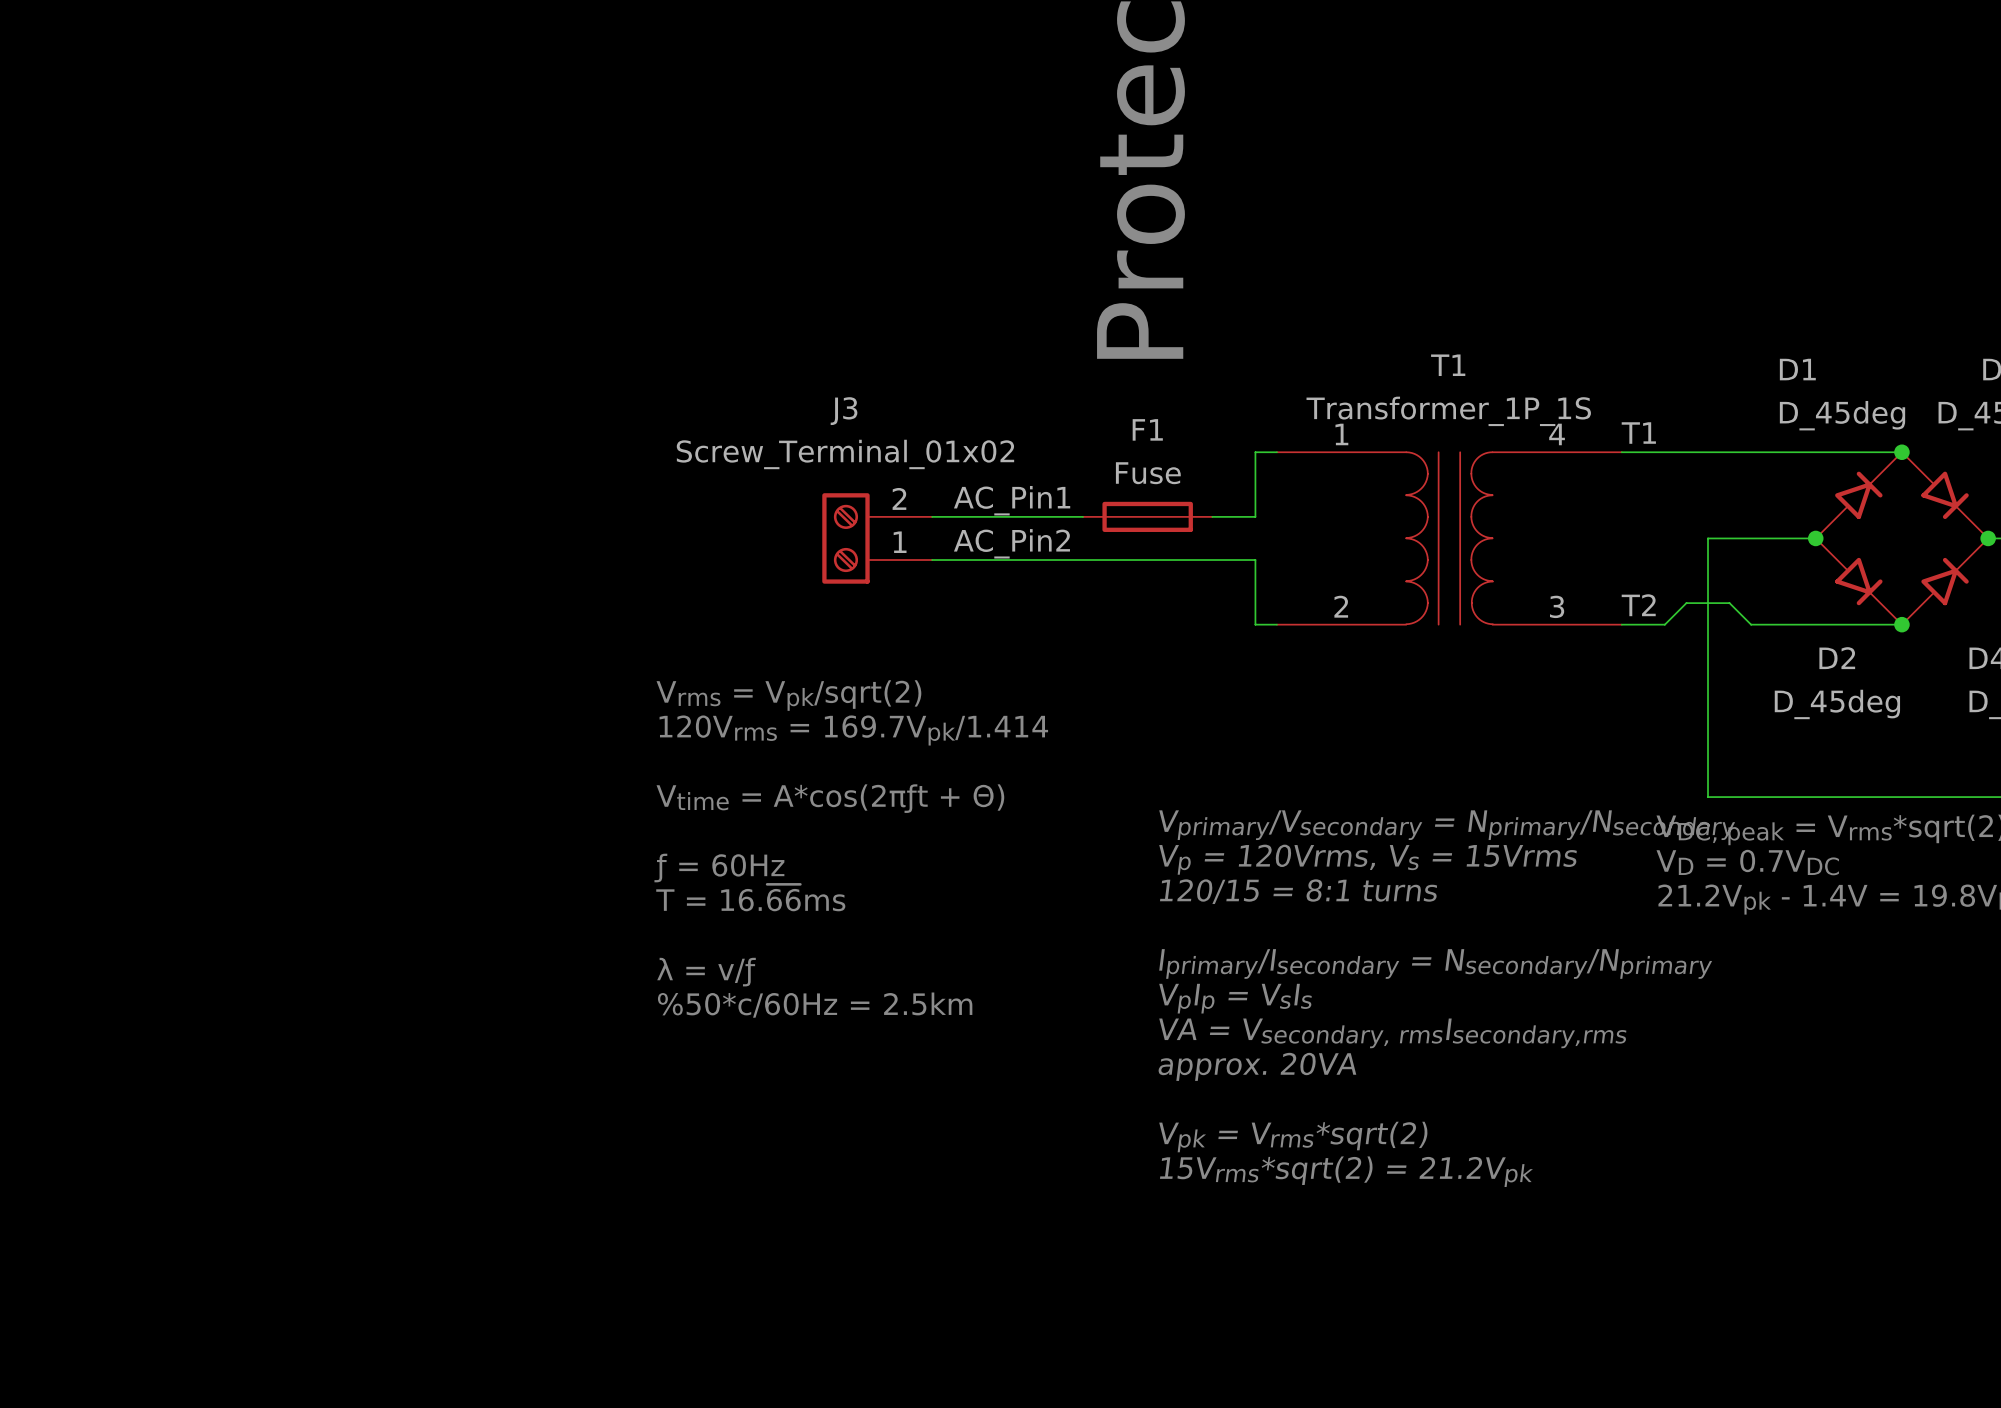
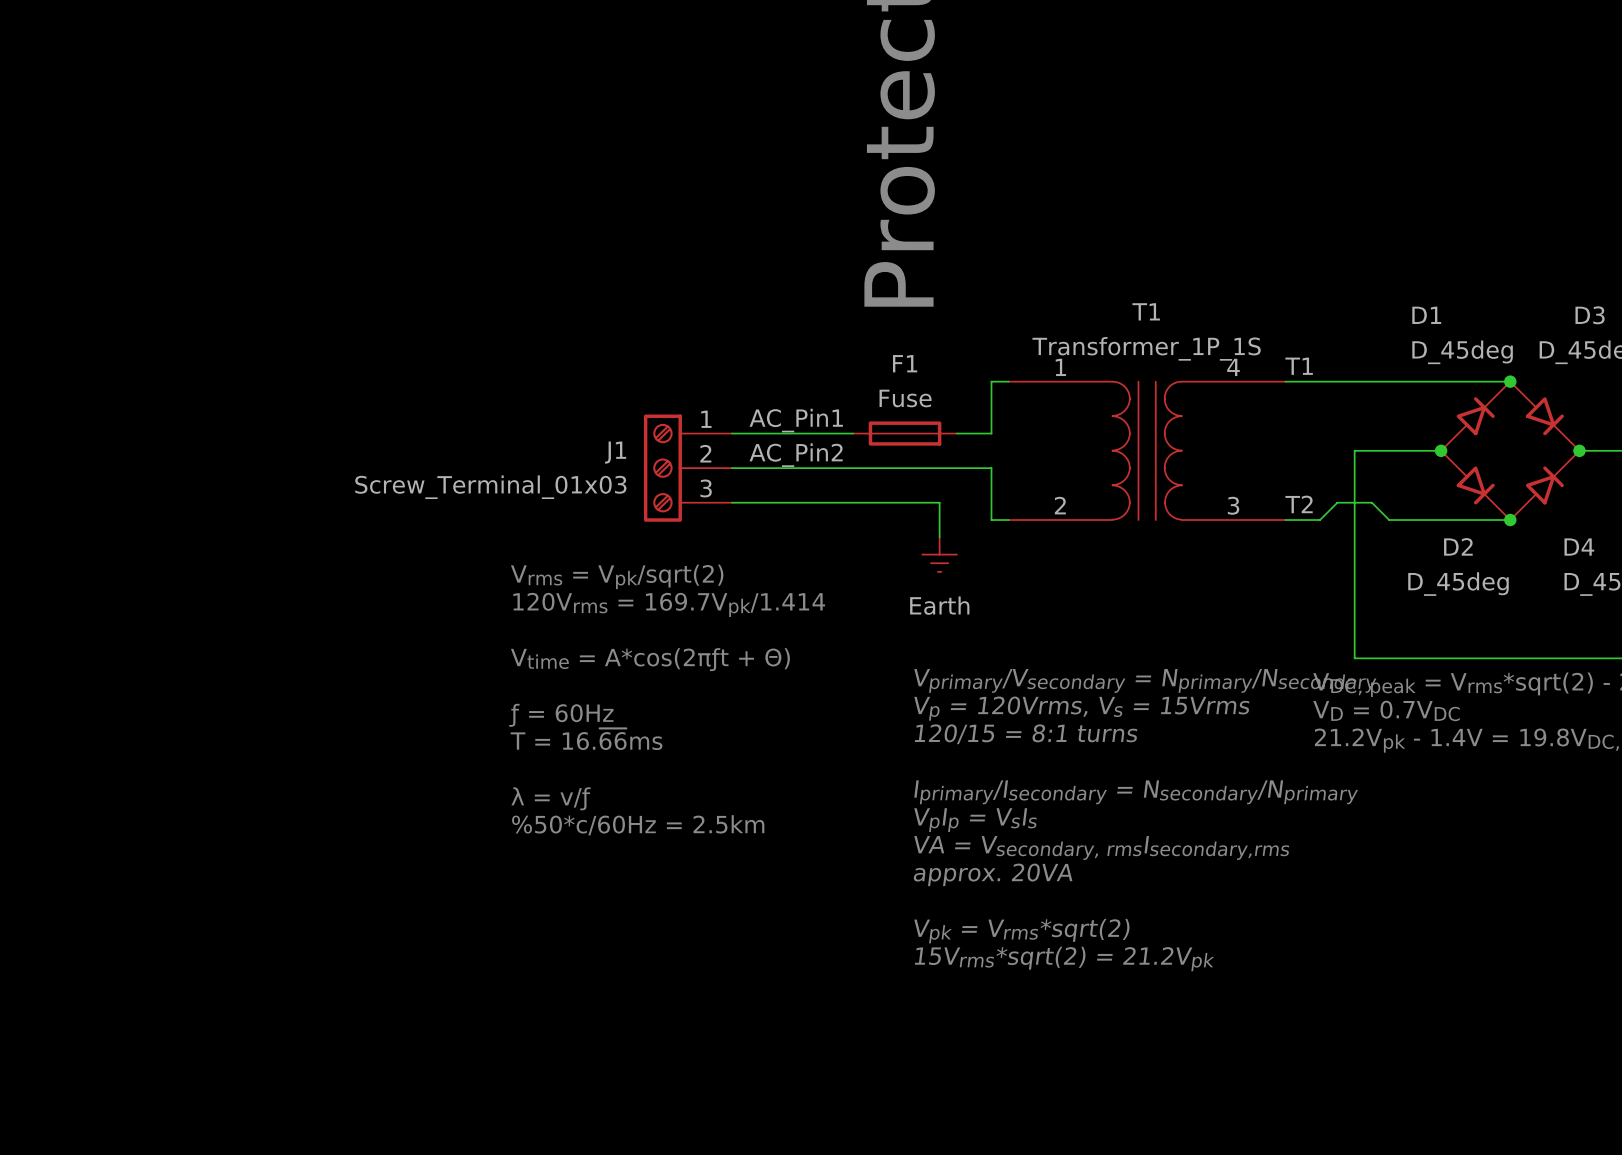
J3: Screw_Terminal_01x02 (877, 538) -> none
J1: none -> Screw_Terminal_01x03 (688, 468)
wire: none -> (732, 502) (939, 502) (939, 537)
power symbol: none -> Earth (939, 554)

